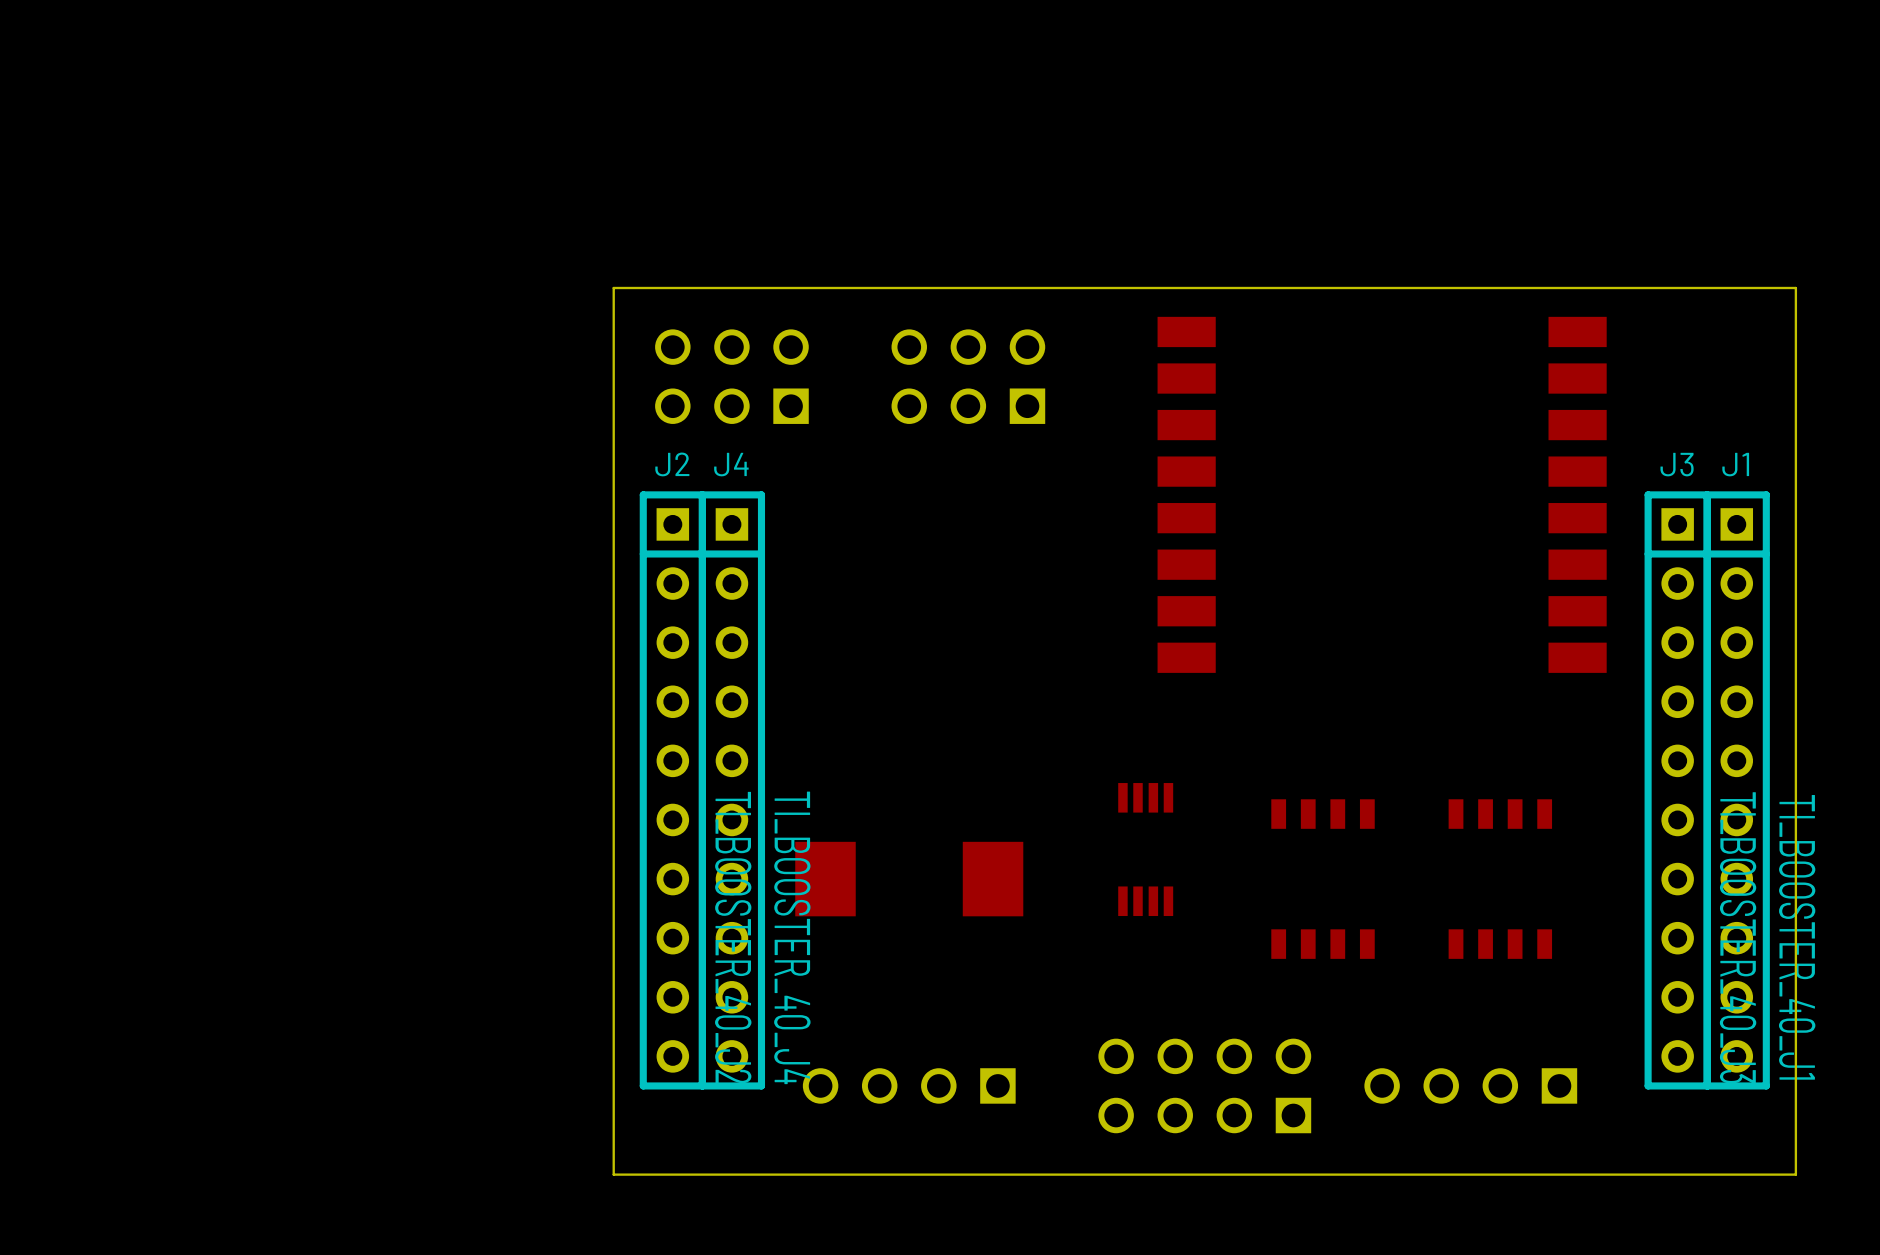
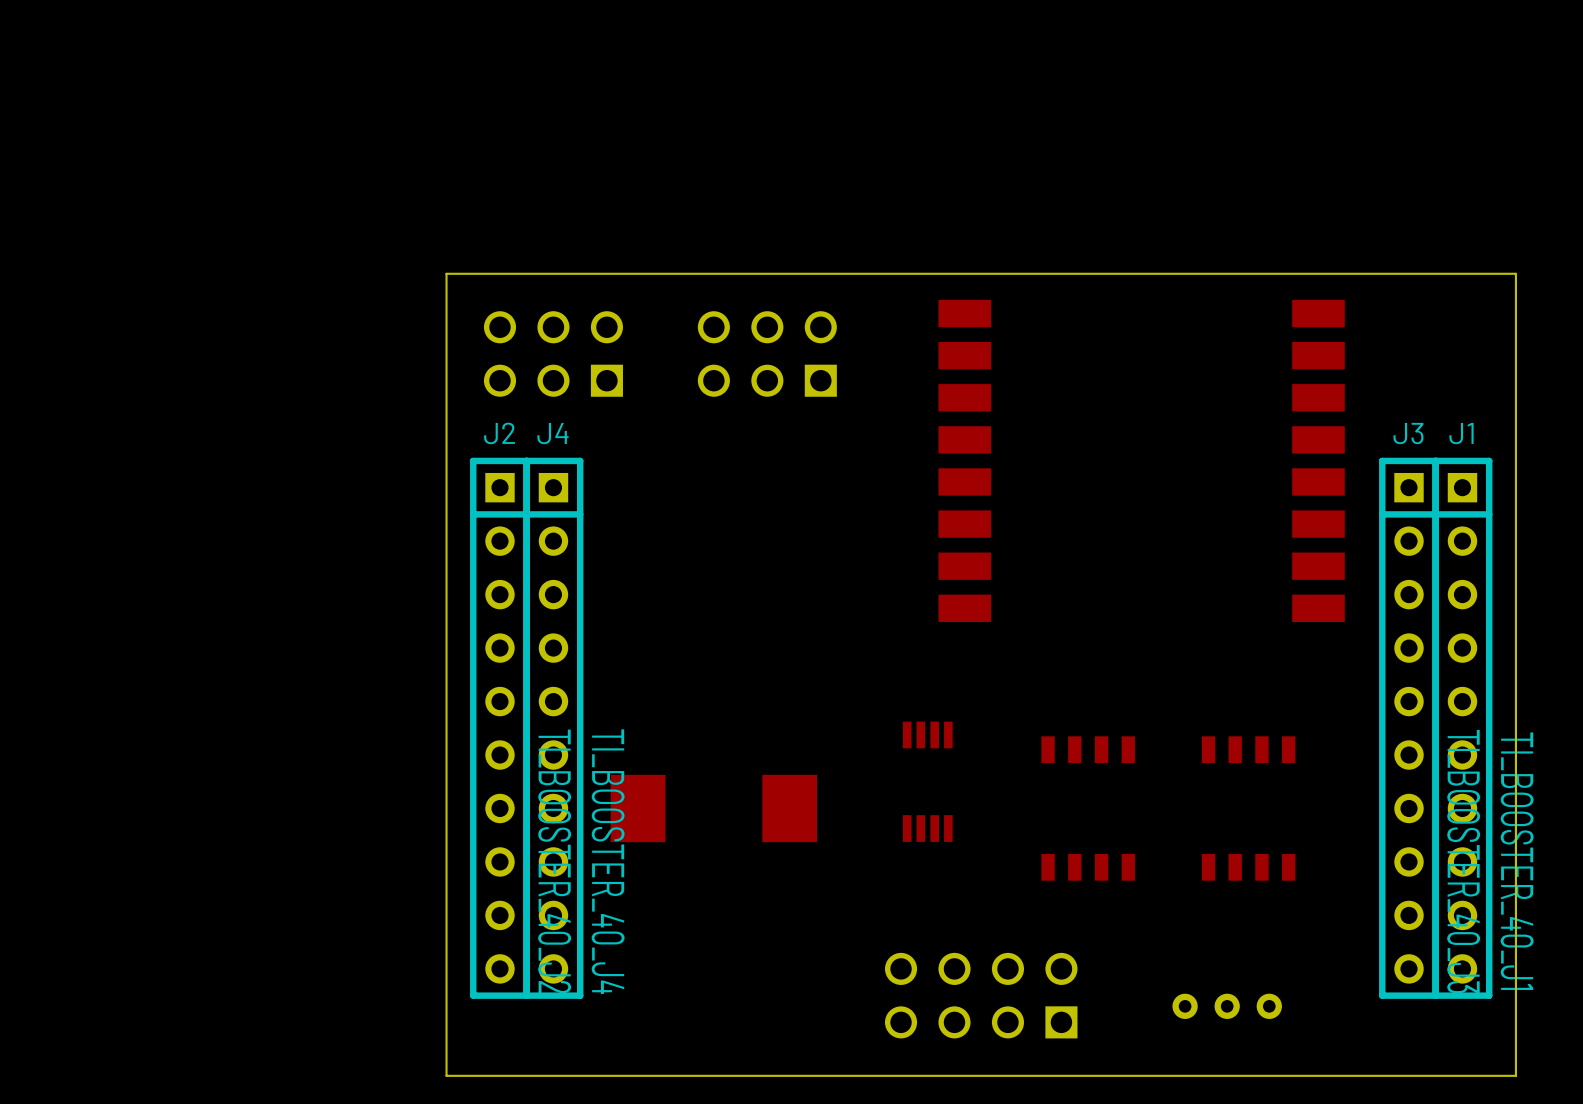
part footprint: [1364, 1068, 1578, 1104] -> [1172, 993, 1282, 1019]
part: (909, 1085) -> none

